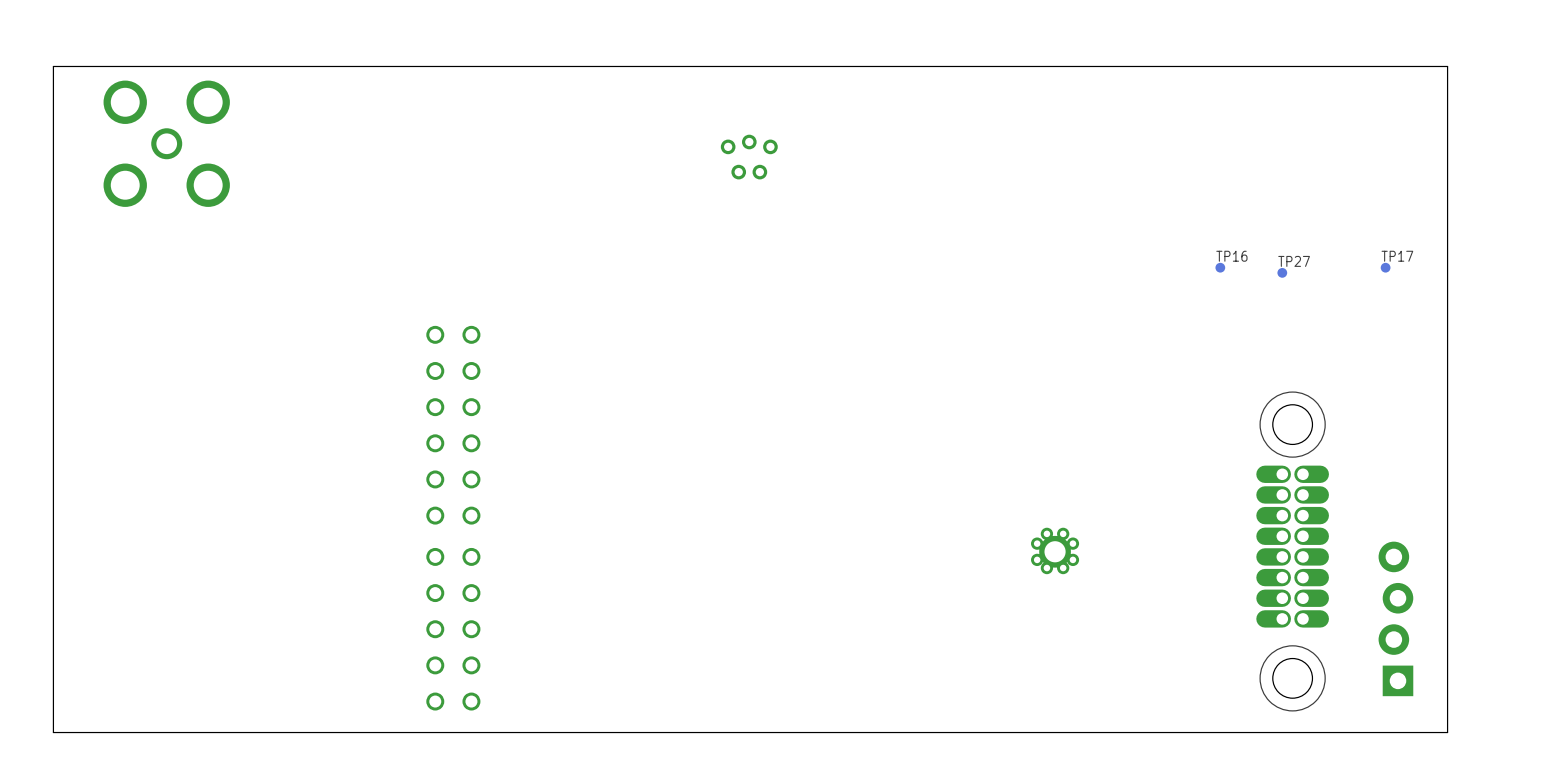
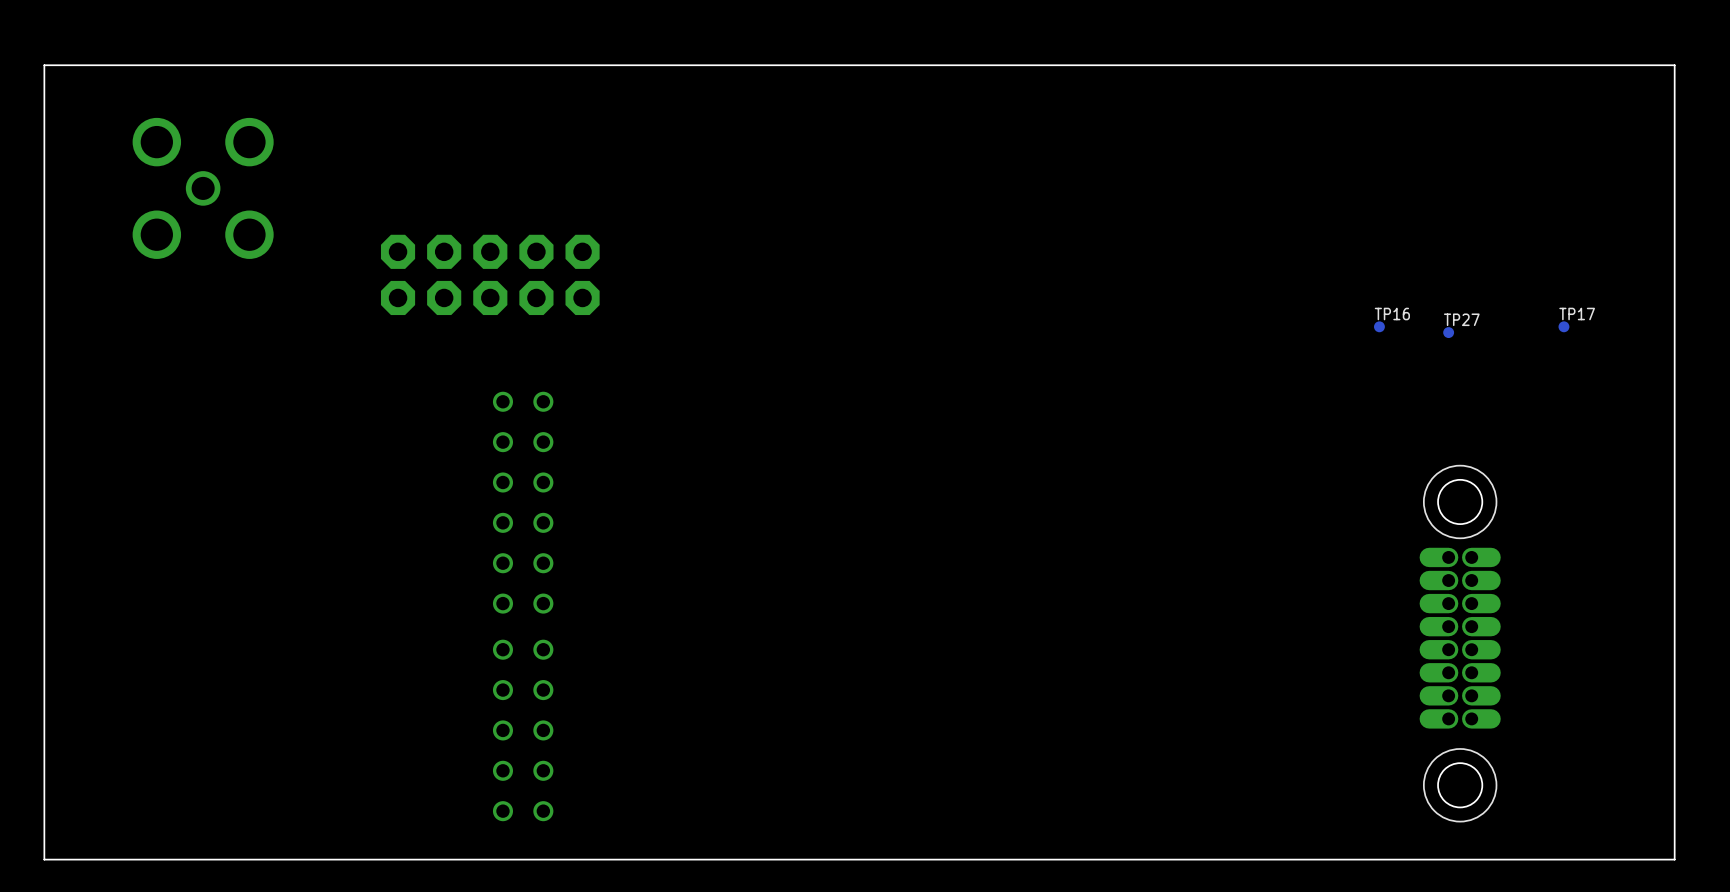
board edge: (1447, 66) (53, 66) (53, 732) (1447, 732) (1447, 66) -> (1674, 65) (1674, 859) (44, 859) (44, 65) (1674, 65)
part: (749, 157) -> none
part: none -> (490, 274)
part: (1055, 550) -> none
part: (1395, 618) -> none

